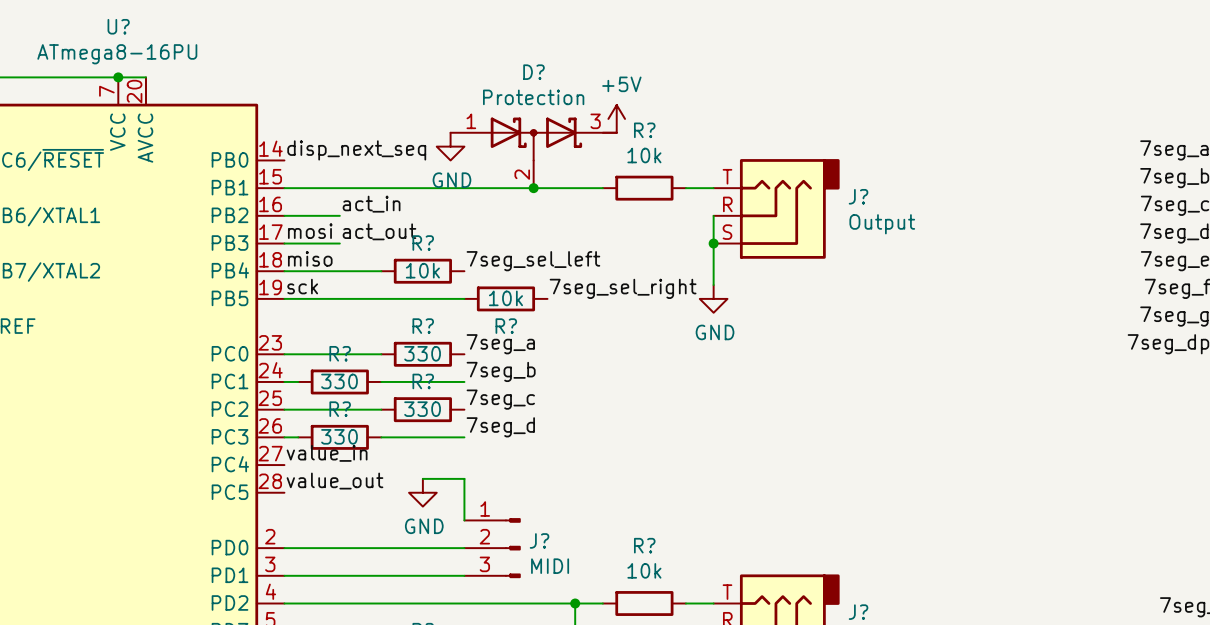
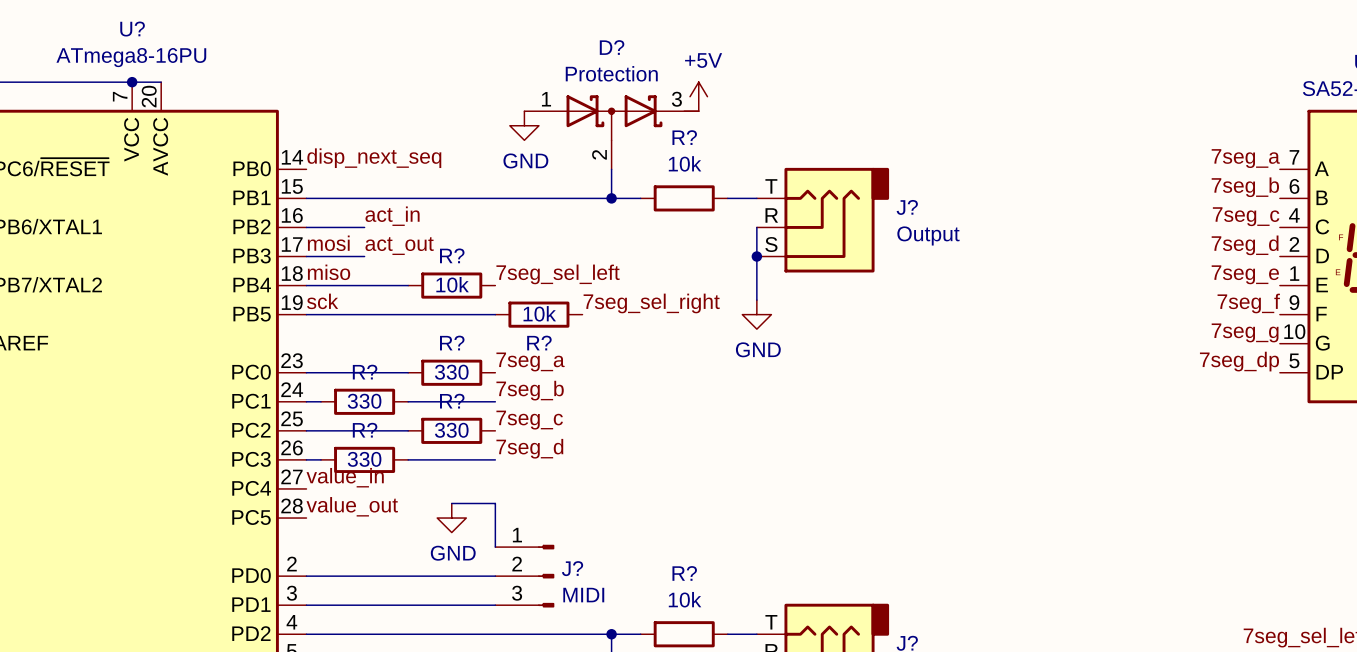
power symbol position: +5V (616, 118) -> +5V (698, 96)
power symbol position: GND (450, 146) -> GND (524, 125)
D? position: (533, 152) -> (611, 132)
wire: none -> (611, 169) (611, 198)
junction position: (533, 188) -> (611, 198)

